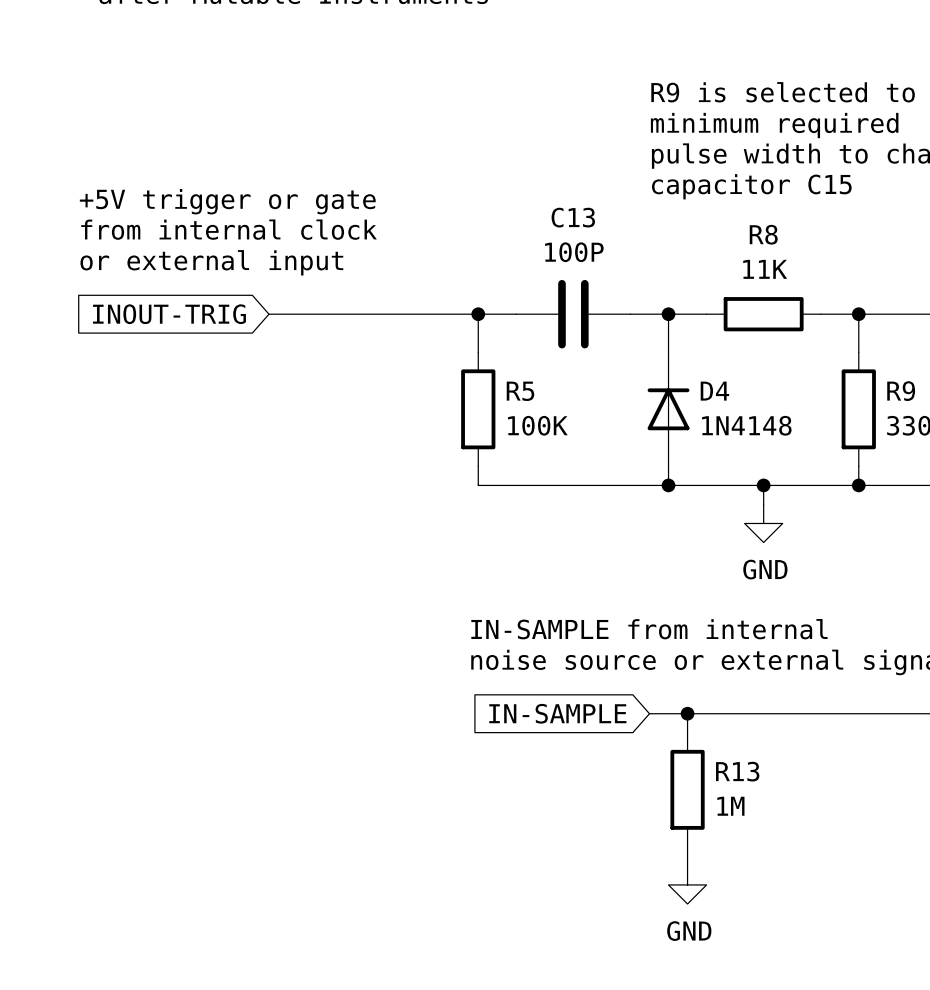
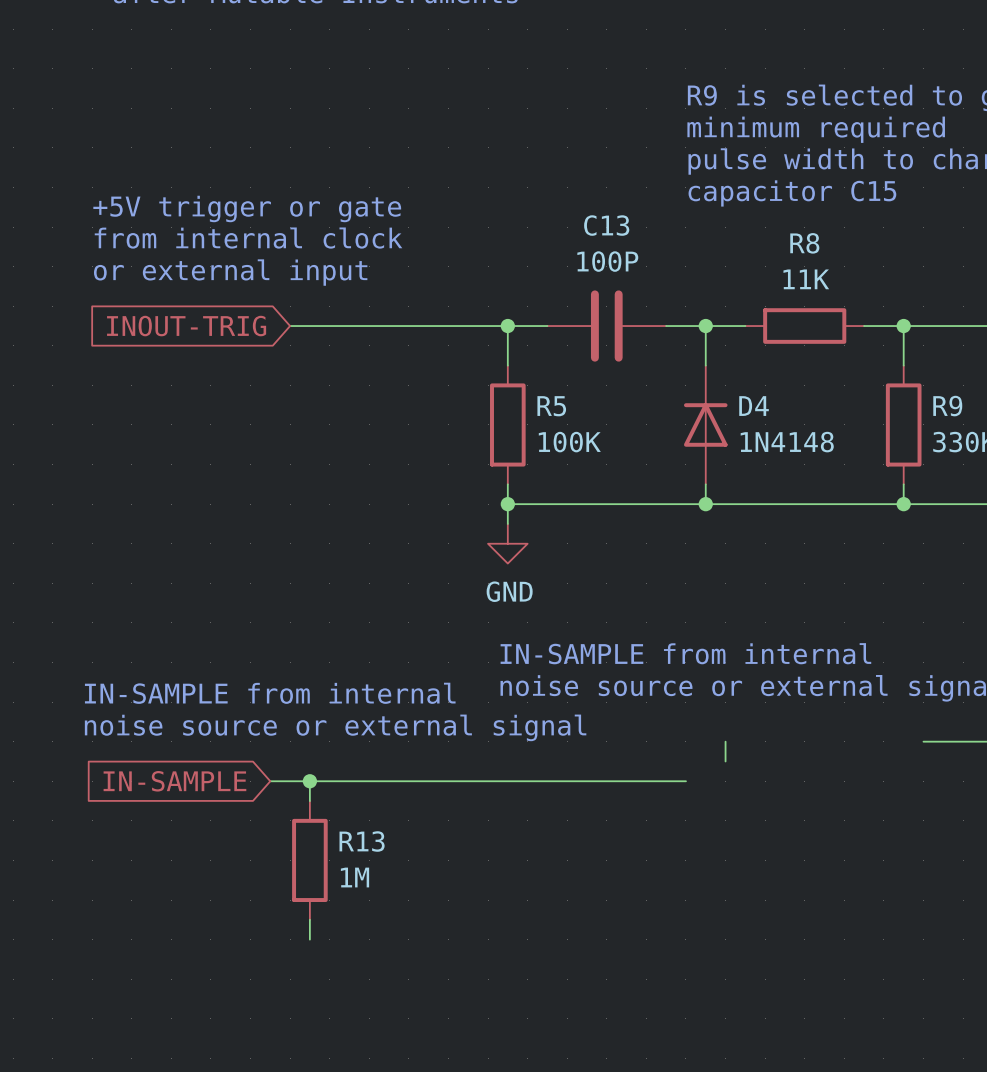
junction: none -> (507, 504)
wire: (763, 485) (763, 504) -> (507, 504) (507, 523)
junction: (763, 485) -> none
power symbol: none -> GND (507, 543)
power symbol: GND (763, 523) -> none
text: none -> IN-SAMPLE from internal (270, 693)
text: none -> noise source or external signal (335, 727)
global label: IN-SAMPLE (557, 713) -> none
wire: (649, 713) (877, 713) -> none
junction: (687, 713) -> none
global label: none -> IN-SAMPLE (174, 781)
wire: none -> (270, 781) (685, 781)
wire: none -> (309, 781) (309, 801)
junction: none -> (309, 781)
R13 position: (687, 789) -> (309, 860)
wire: (687, 846) (687, 865) -> none
wire: none -> (309, 919) (309, 939)
power symbol: GND (687, 884) -> none

